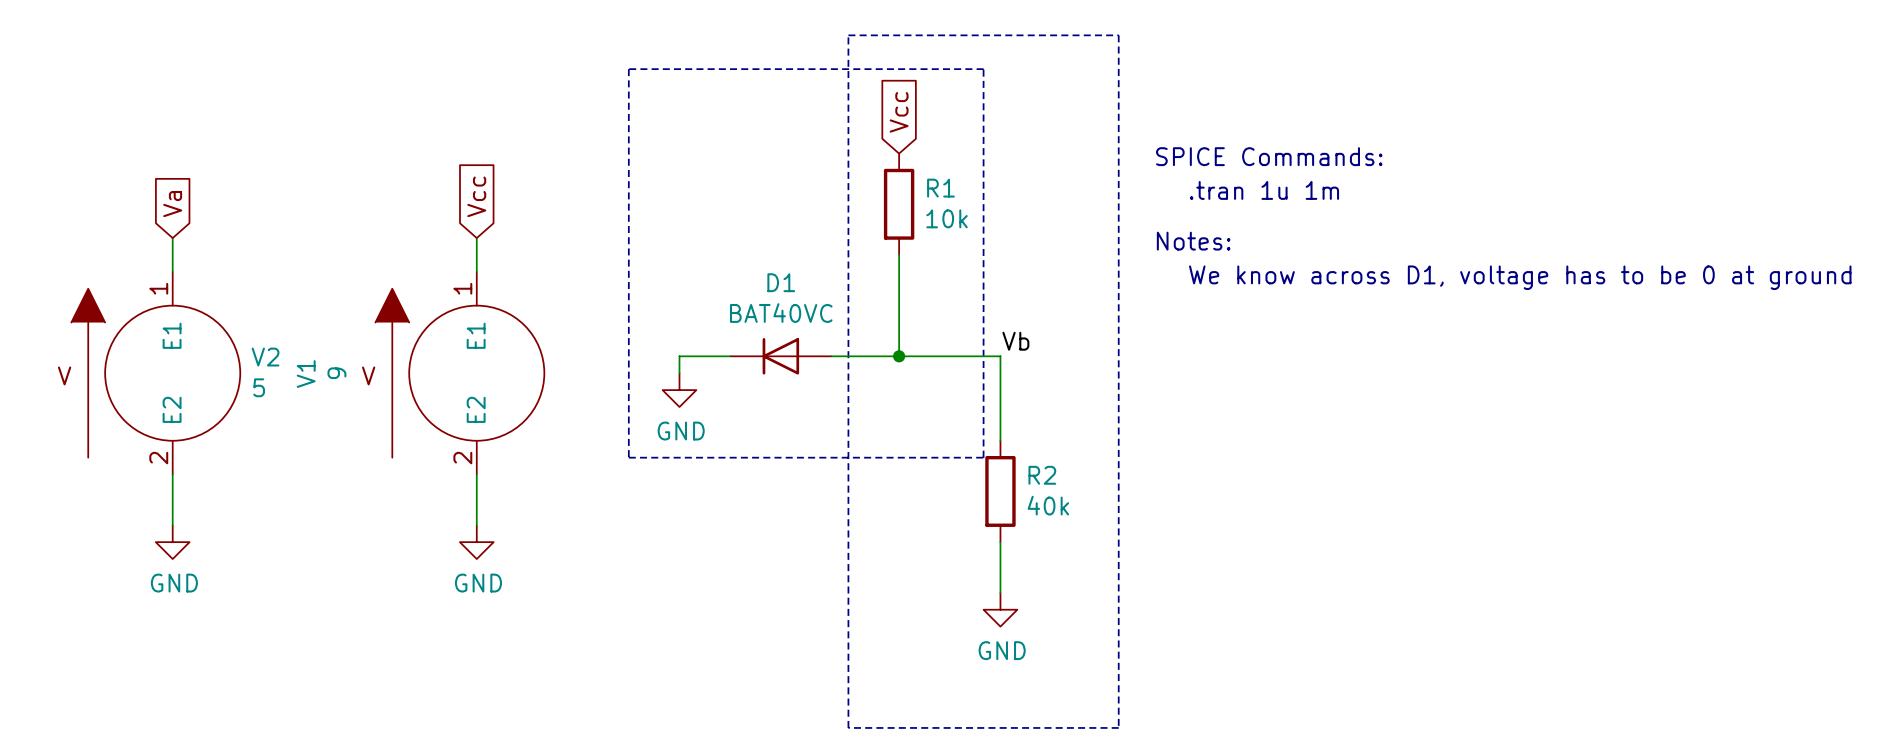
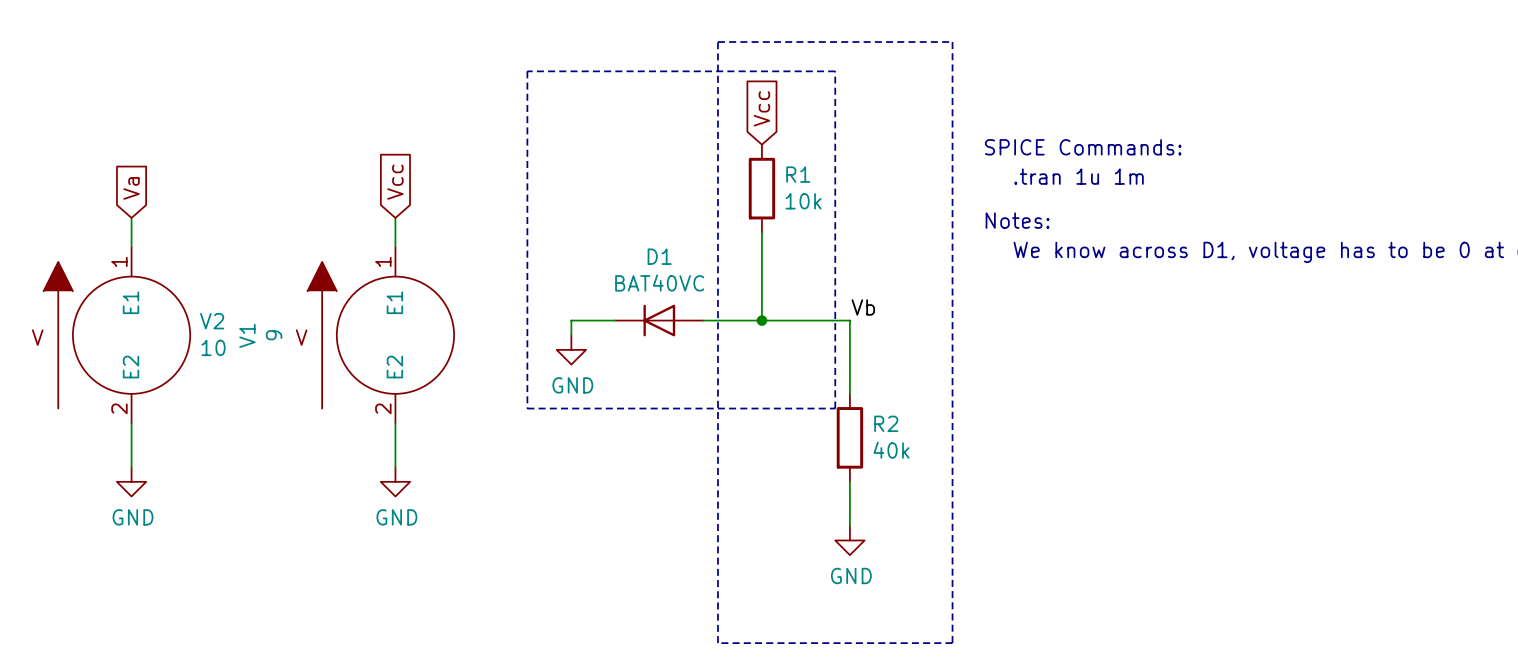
V2 value: 5 (259, 387) -> 10 (213, 347)

